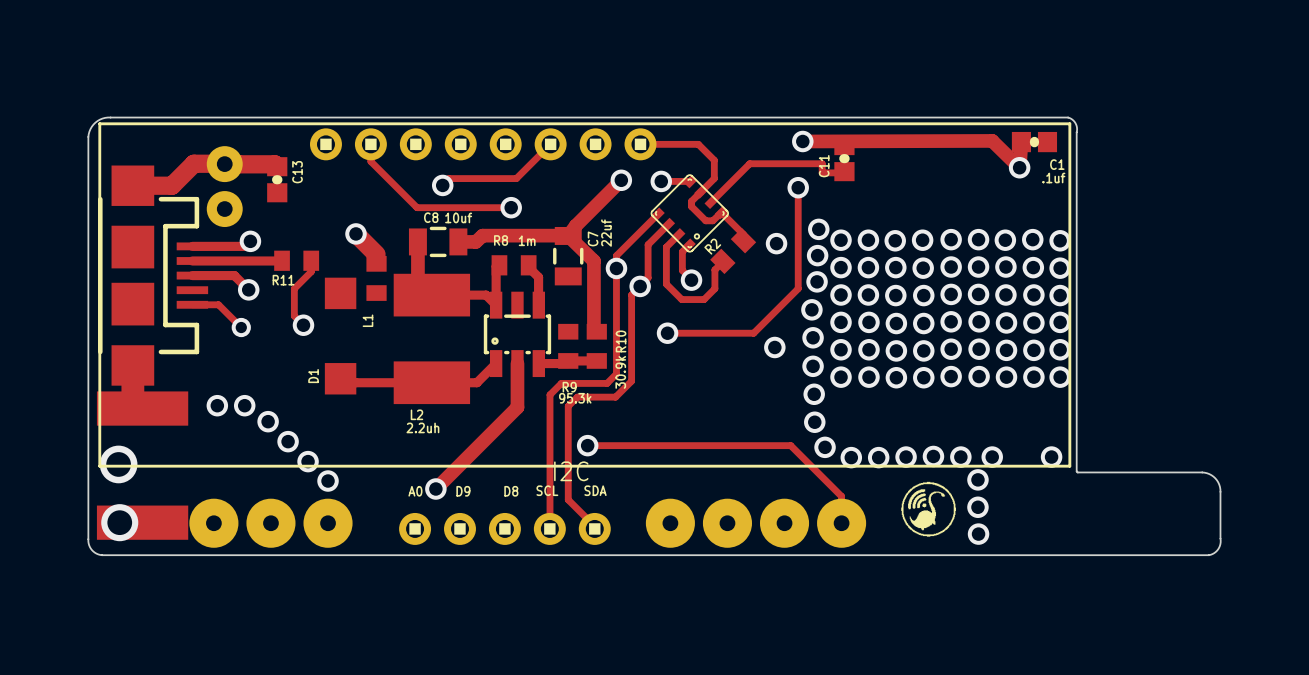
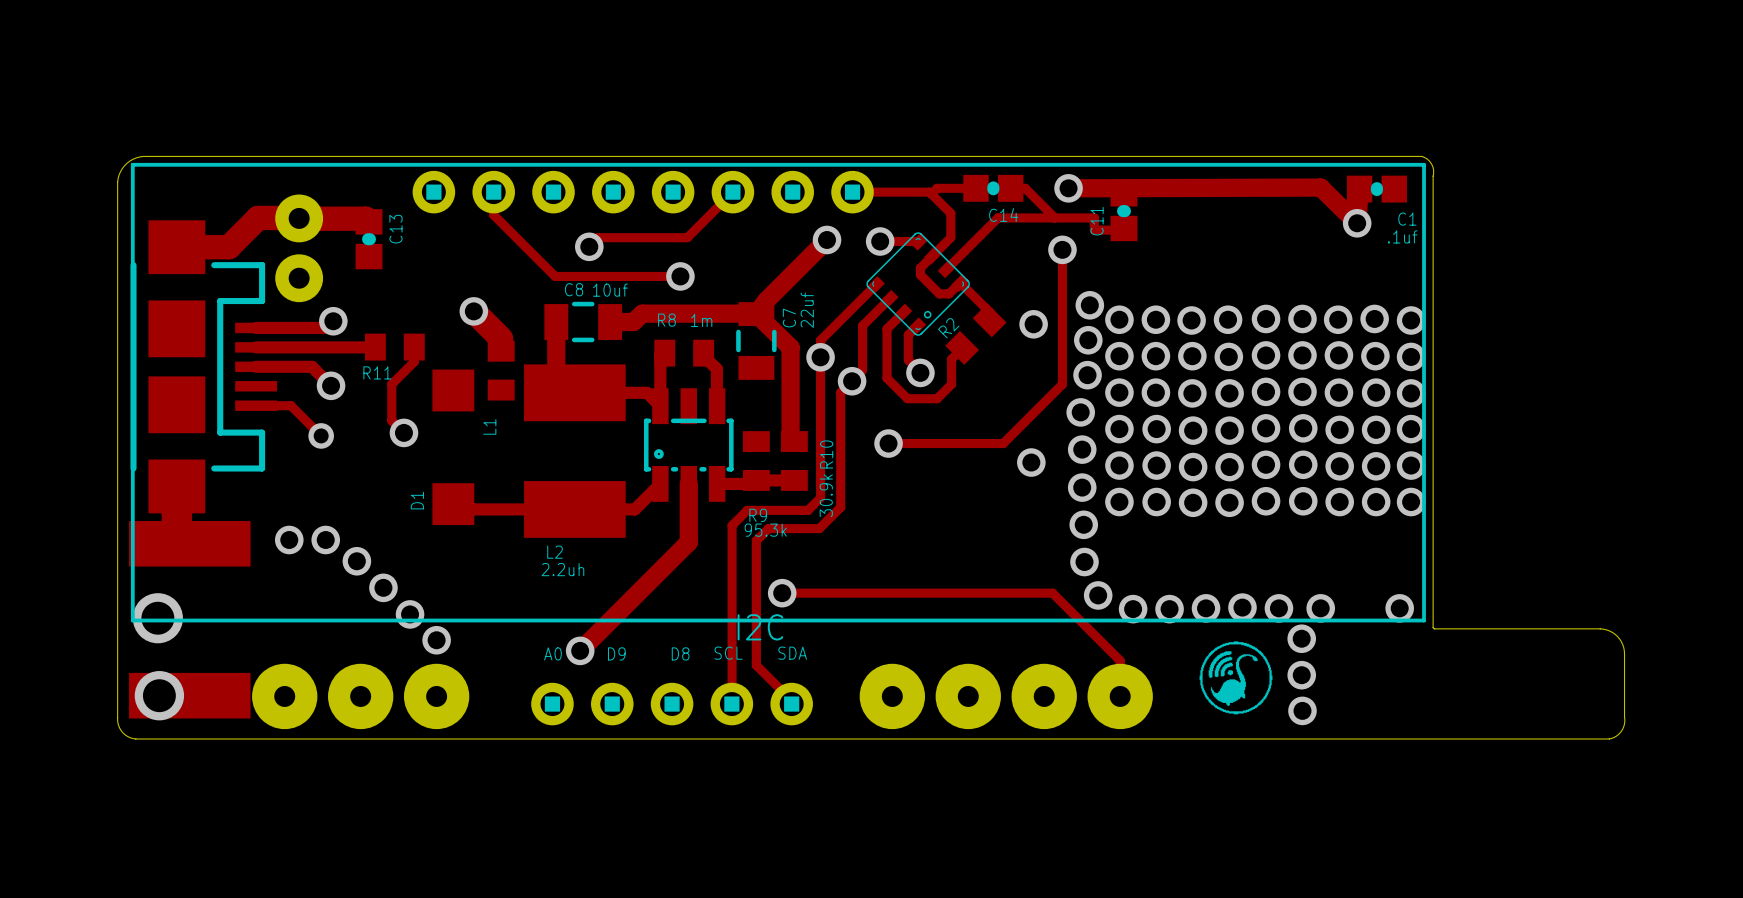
track: none -> (976, 188) (937, 188) (931, 194)
C14: none -> (993, 188)
track: none -> (1010, 188) (1025, 188) (1054, 217)

